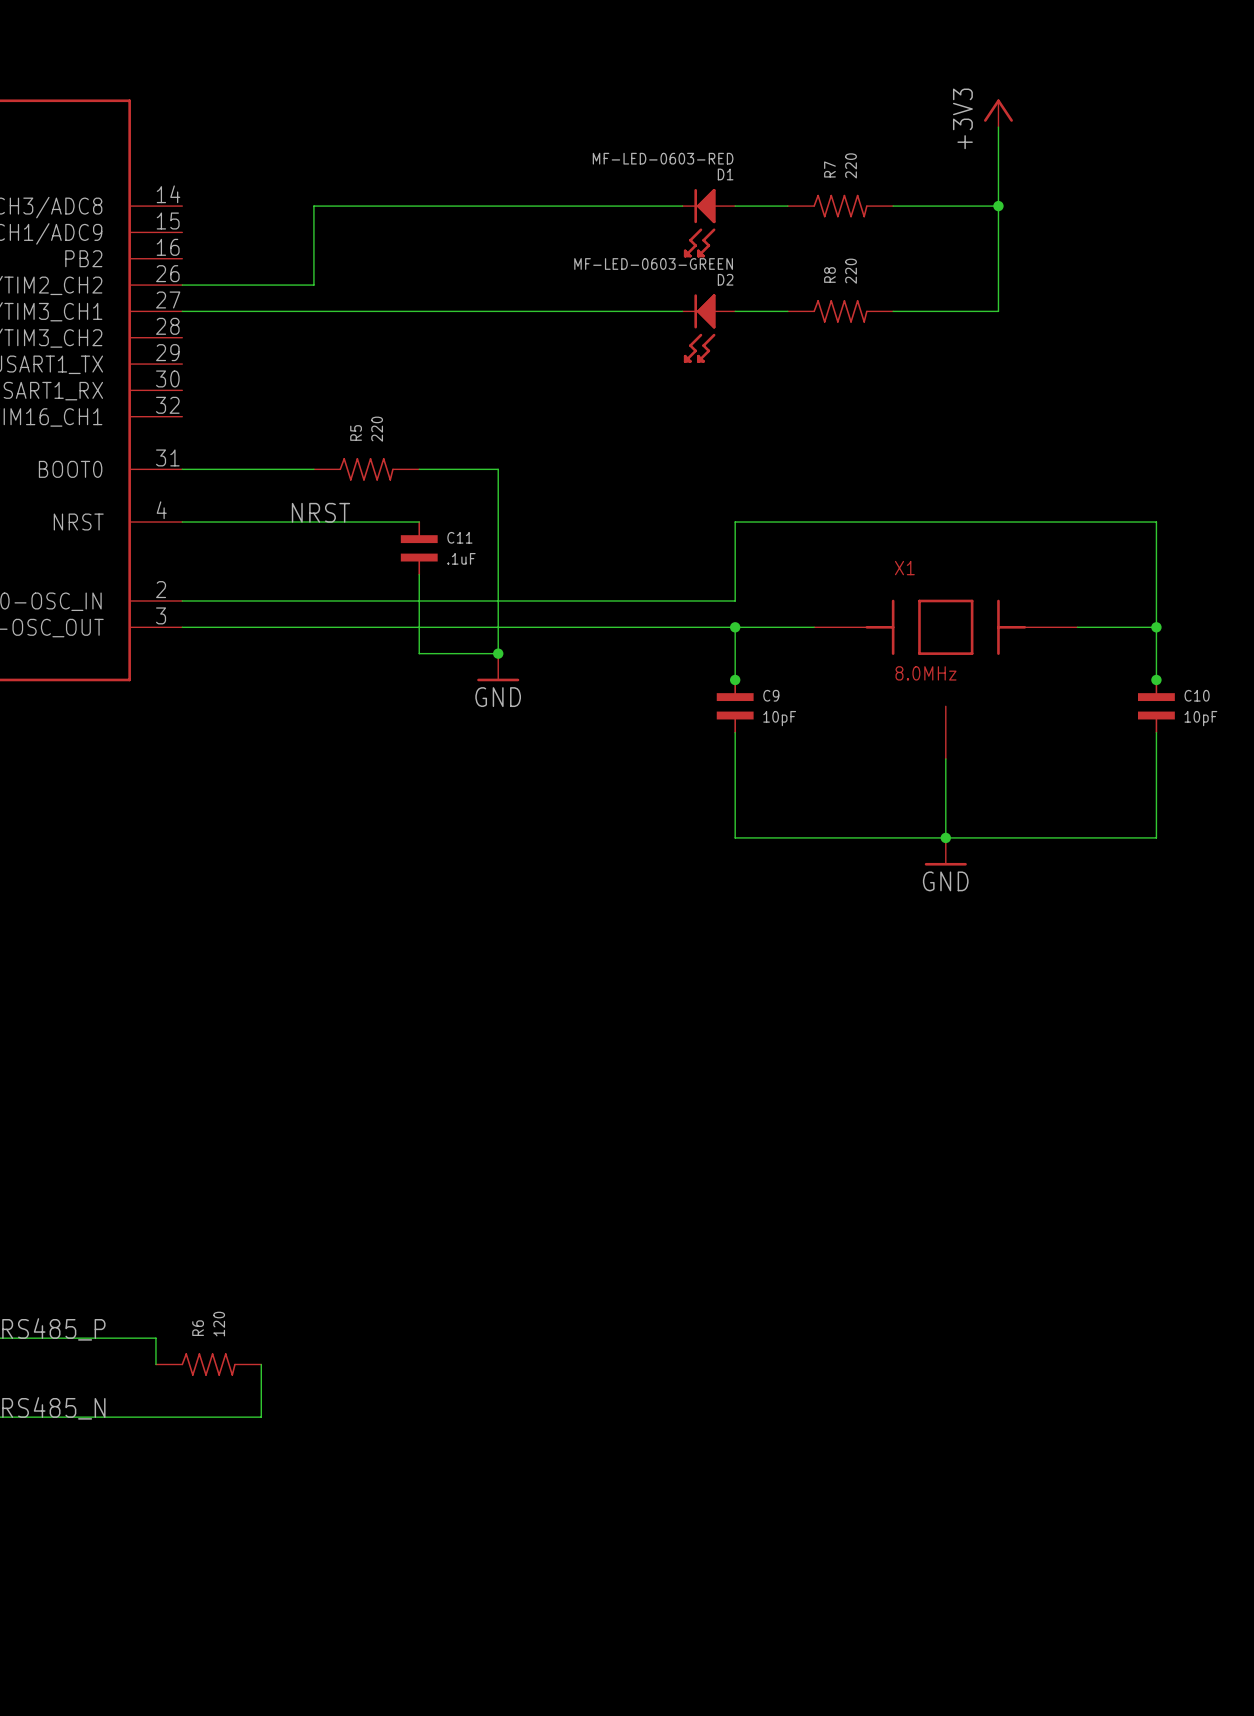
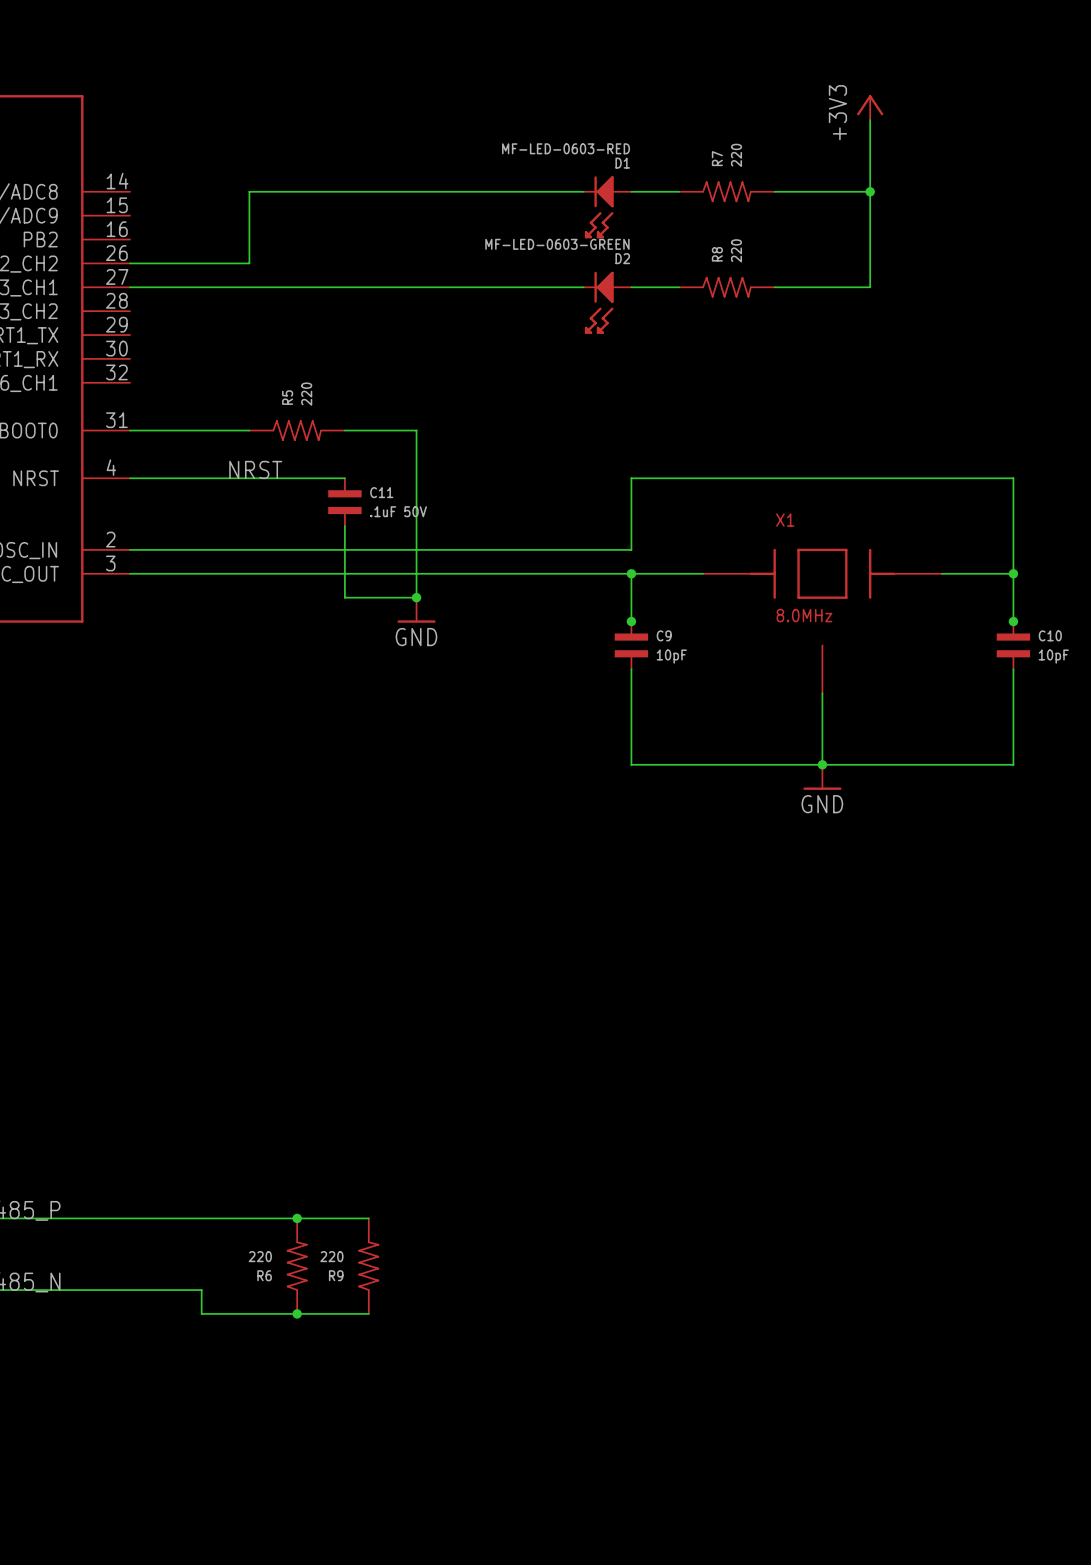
C11 value: .1uF (461, 558) -> .1uF 50V (398, 511)
R6 value: 120 (219, 1324) -> 220 (260, 1256)
wire: (155, 1338) (155, 1364) -> (106, 1218) (368, 1218)
junction: none -> (297, 1218)
R6 rotation: 0° (208, 1364) -> 90° counterclockwise (297, 1266)
R6 position: (208, 1364) -> (297, 1266)
wire: (261, 1364) (261, 1417) -> (368, 1313) (201, 1313) (201, 1290)
R9: none -> 220 (368, 1266)
junction: none -> (297, 1313)

